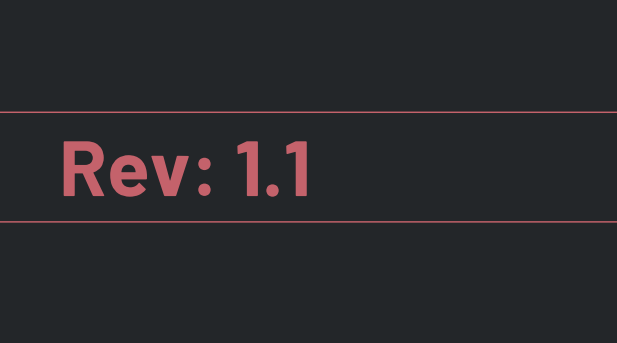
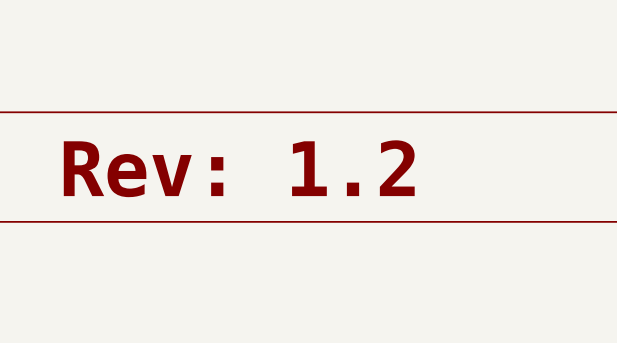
title block: Rev: 1.1 (185, 169) -> Rev: 1.2 (239, 168)

